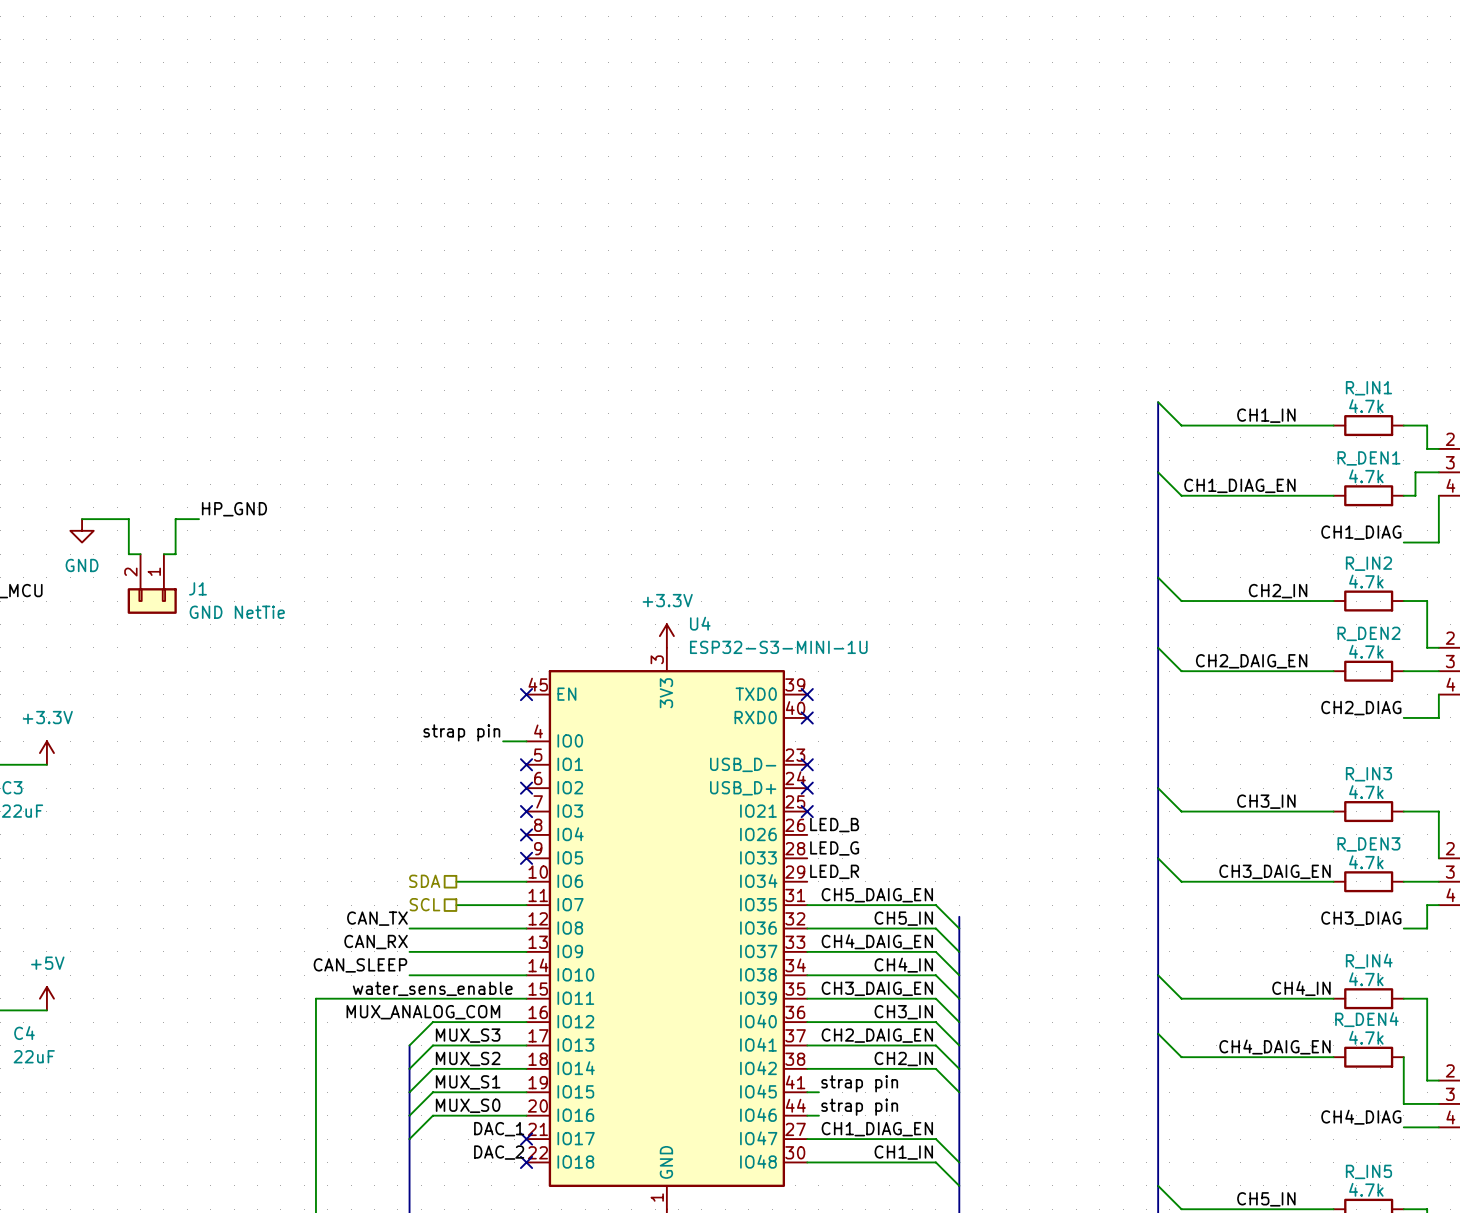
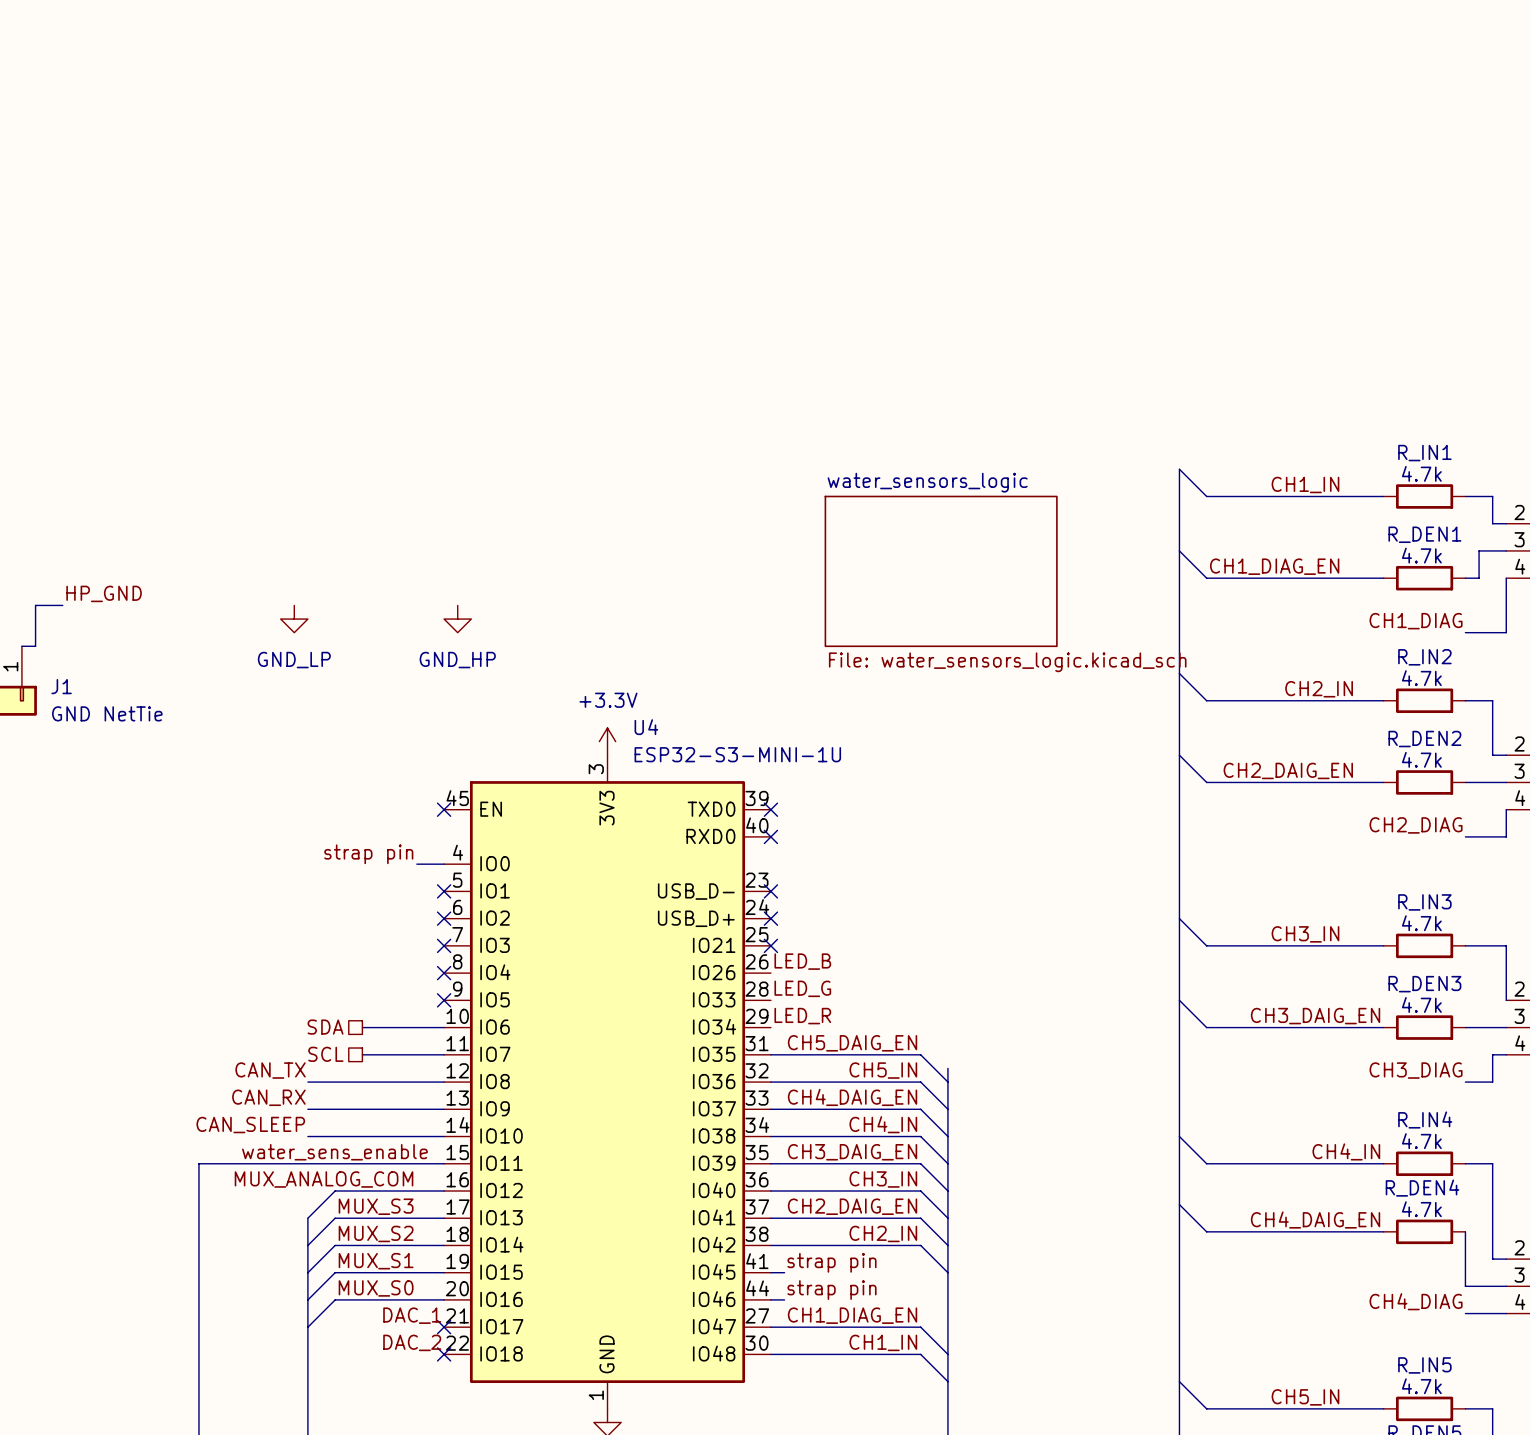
sheet water_sensors_logic: none -> File: water_sensors_logic.kicad_sch (941, 571)
power symbol: none -> GND_LP (294, 619)
power symbol: none -> GND_HP (457, 619)

